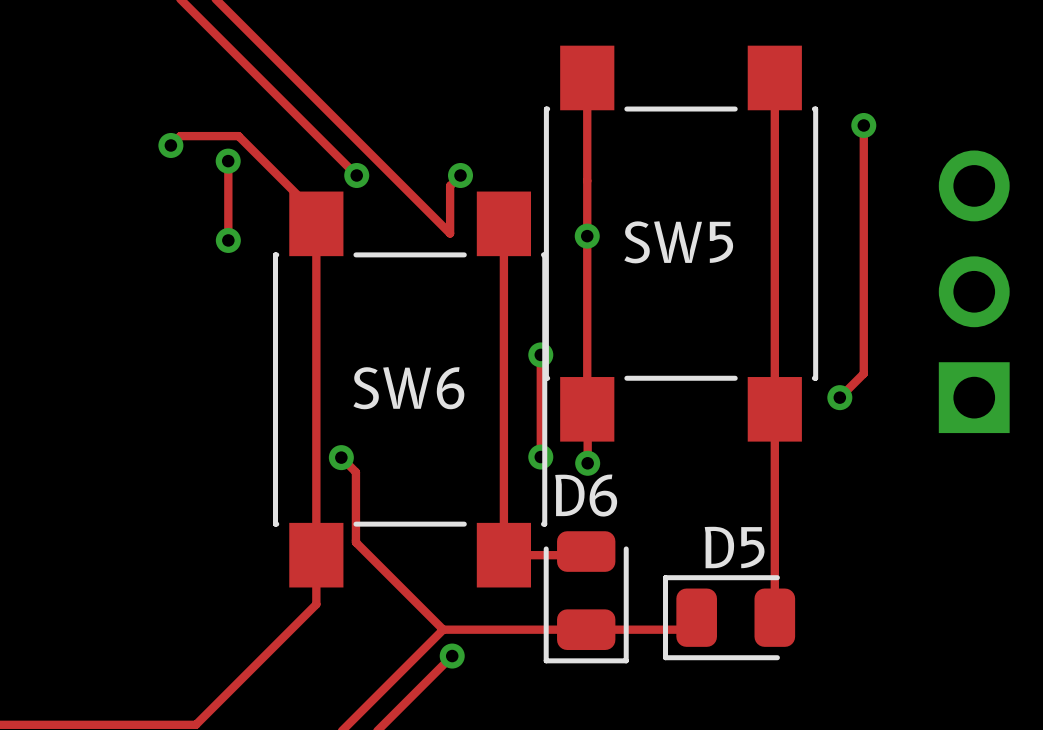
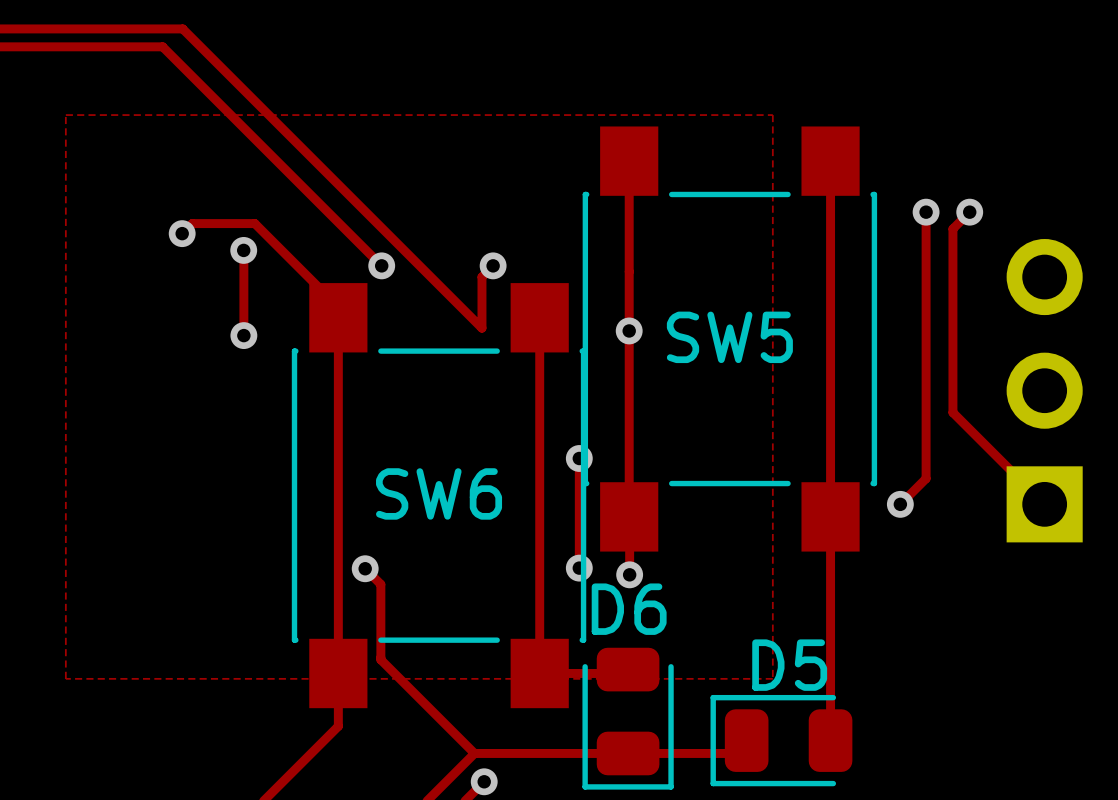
zone outline: none -> (65, 115) (772, 115) (772, 678) (65, 678) (65, 115)
track: none -> (969, 212) (952, 228) (952, 412) (1044, 504)
via: none -> (969, 212)

